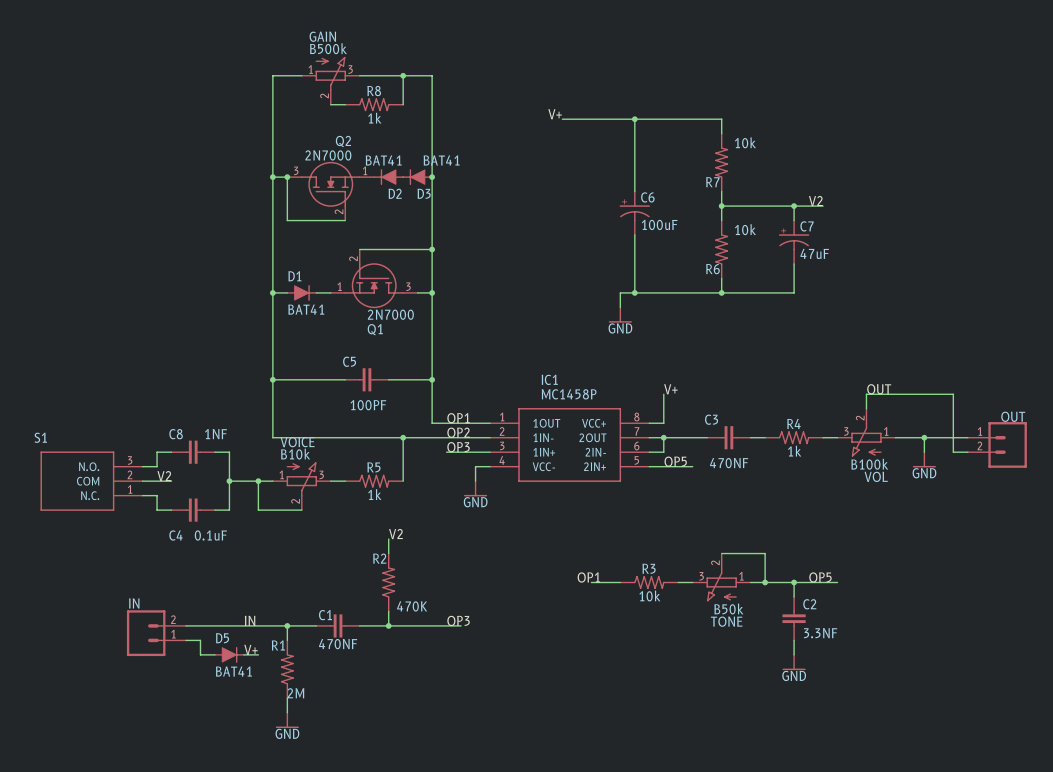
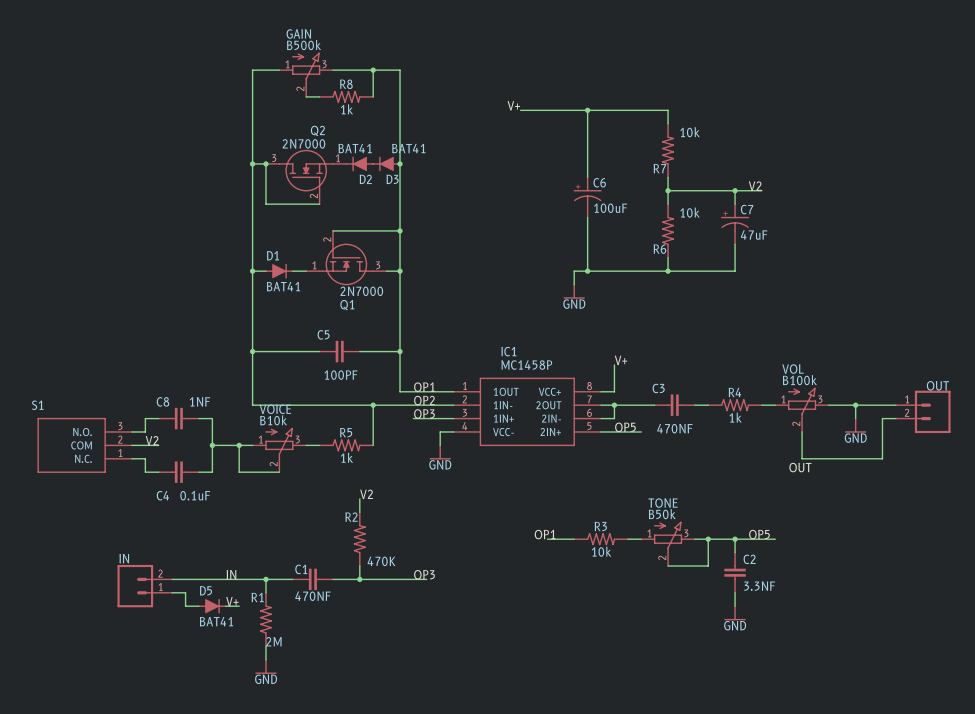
label position: OUT (879, 389) -> OUT (800, 467)
wire: (866, 408) (866, 394) (953, 394) (953, 452) -> (802, 431) (802, 458) (882, 458) (882, 418)
VOL rotation: 0° (866, 439) -> 180° (802, 403)
wire: (721, 553) (765, 553) (765, 582) -> (668, 566) (708, 566) (708, 539)
TONE rotation: 0° (721, 584) -> 180° (668, 537)

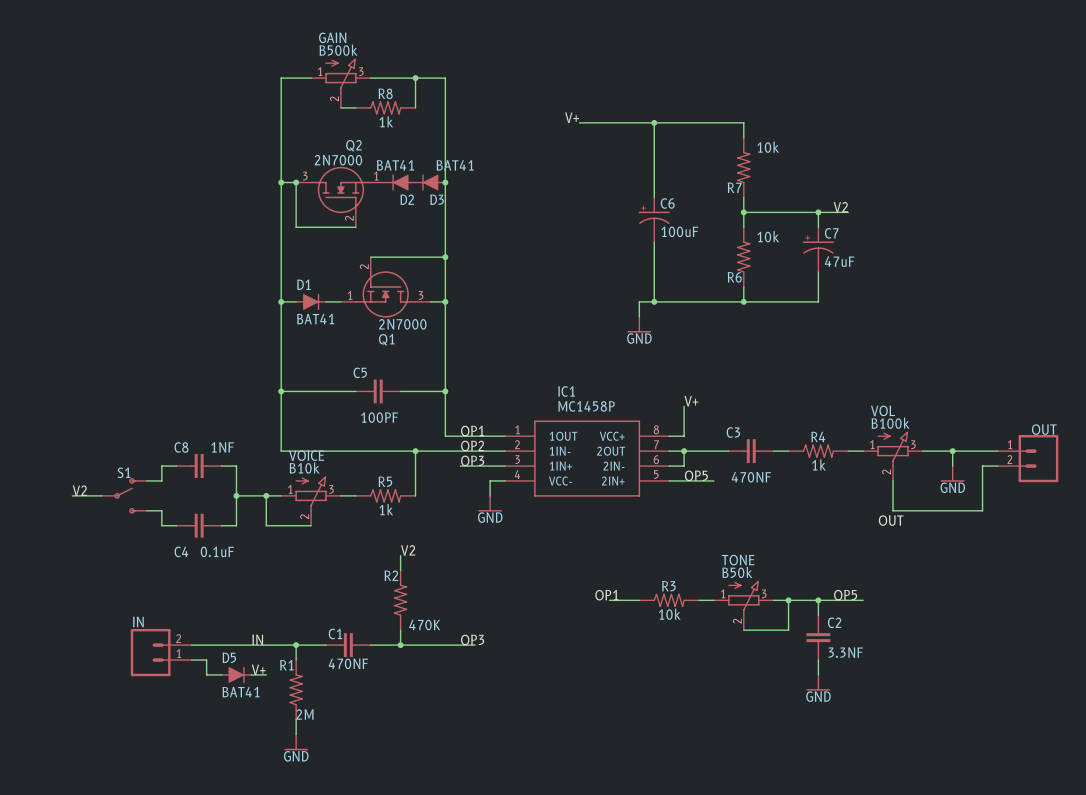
S1 name position: S1 (37, 405) -> S1 (124, 472)
S1 symbol: [37, 417, 132, 473] -> [102, 478, 147, 514]
label position: V2 (152, 440) -> V2 (79, 490)
wire: (131, 445) (158, 445) -> (72, 495) (102, 495)

